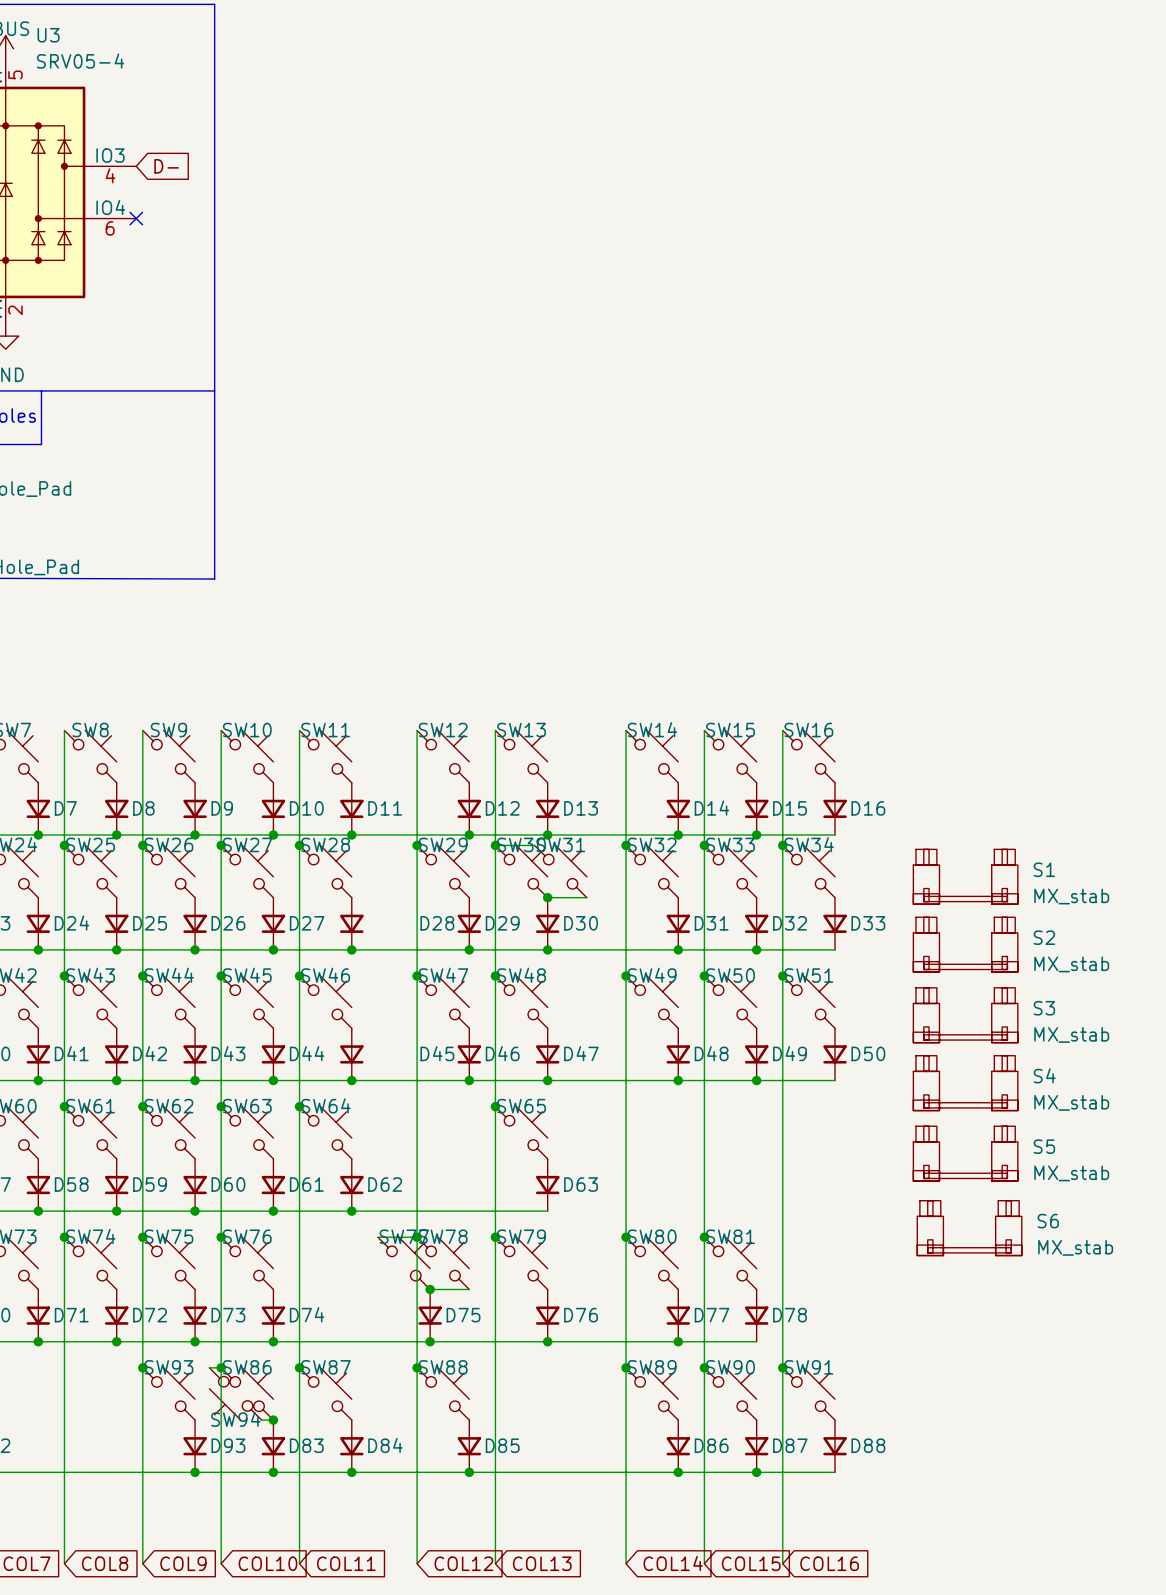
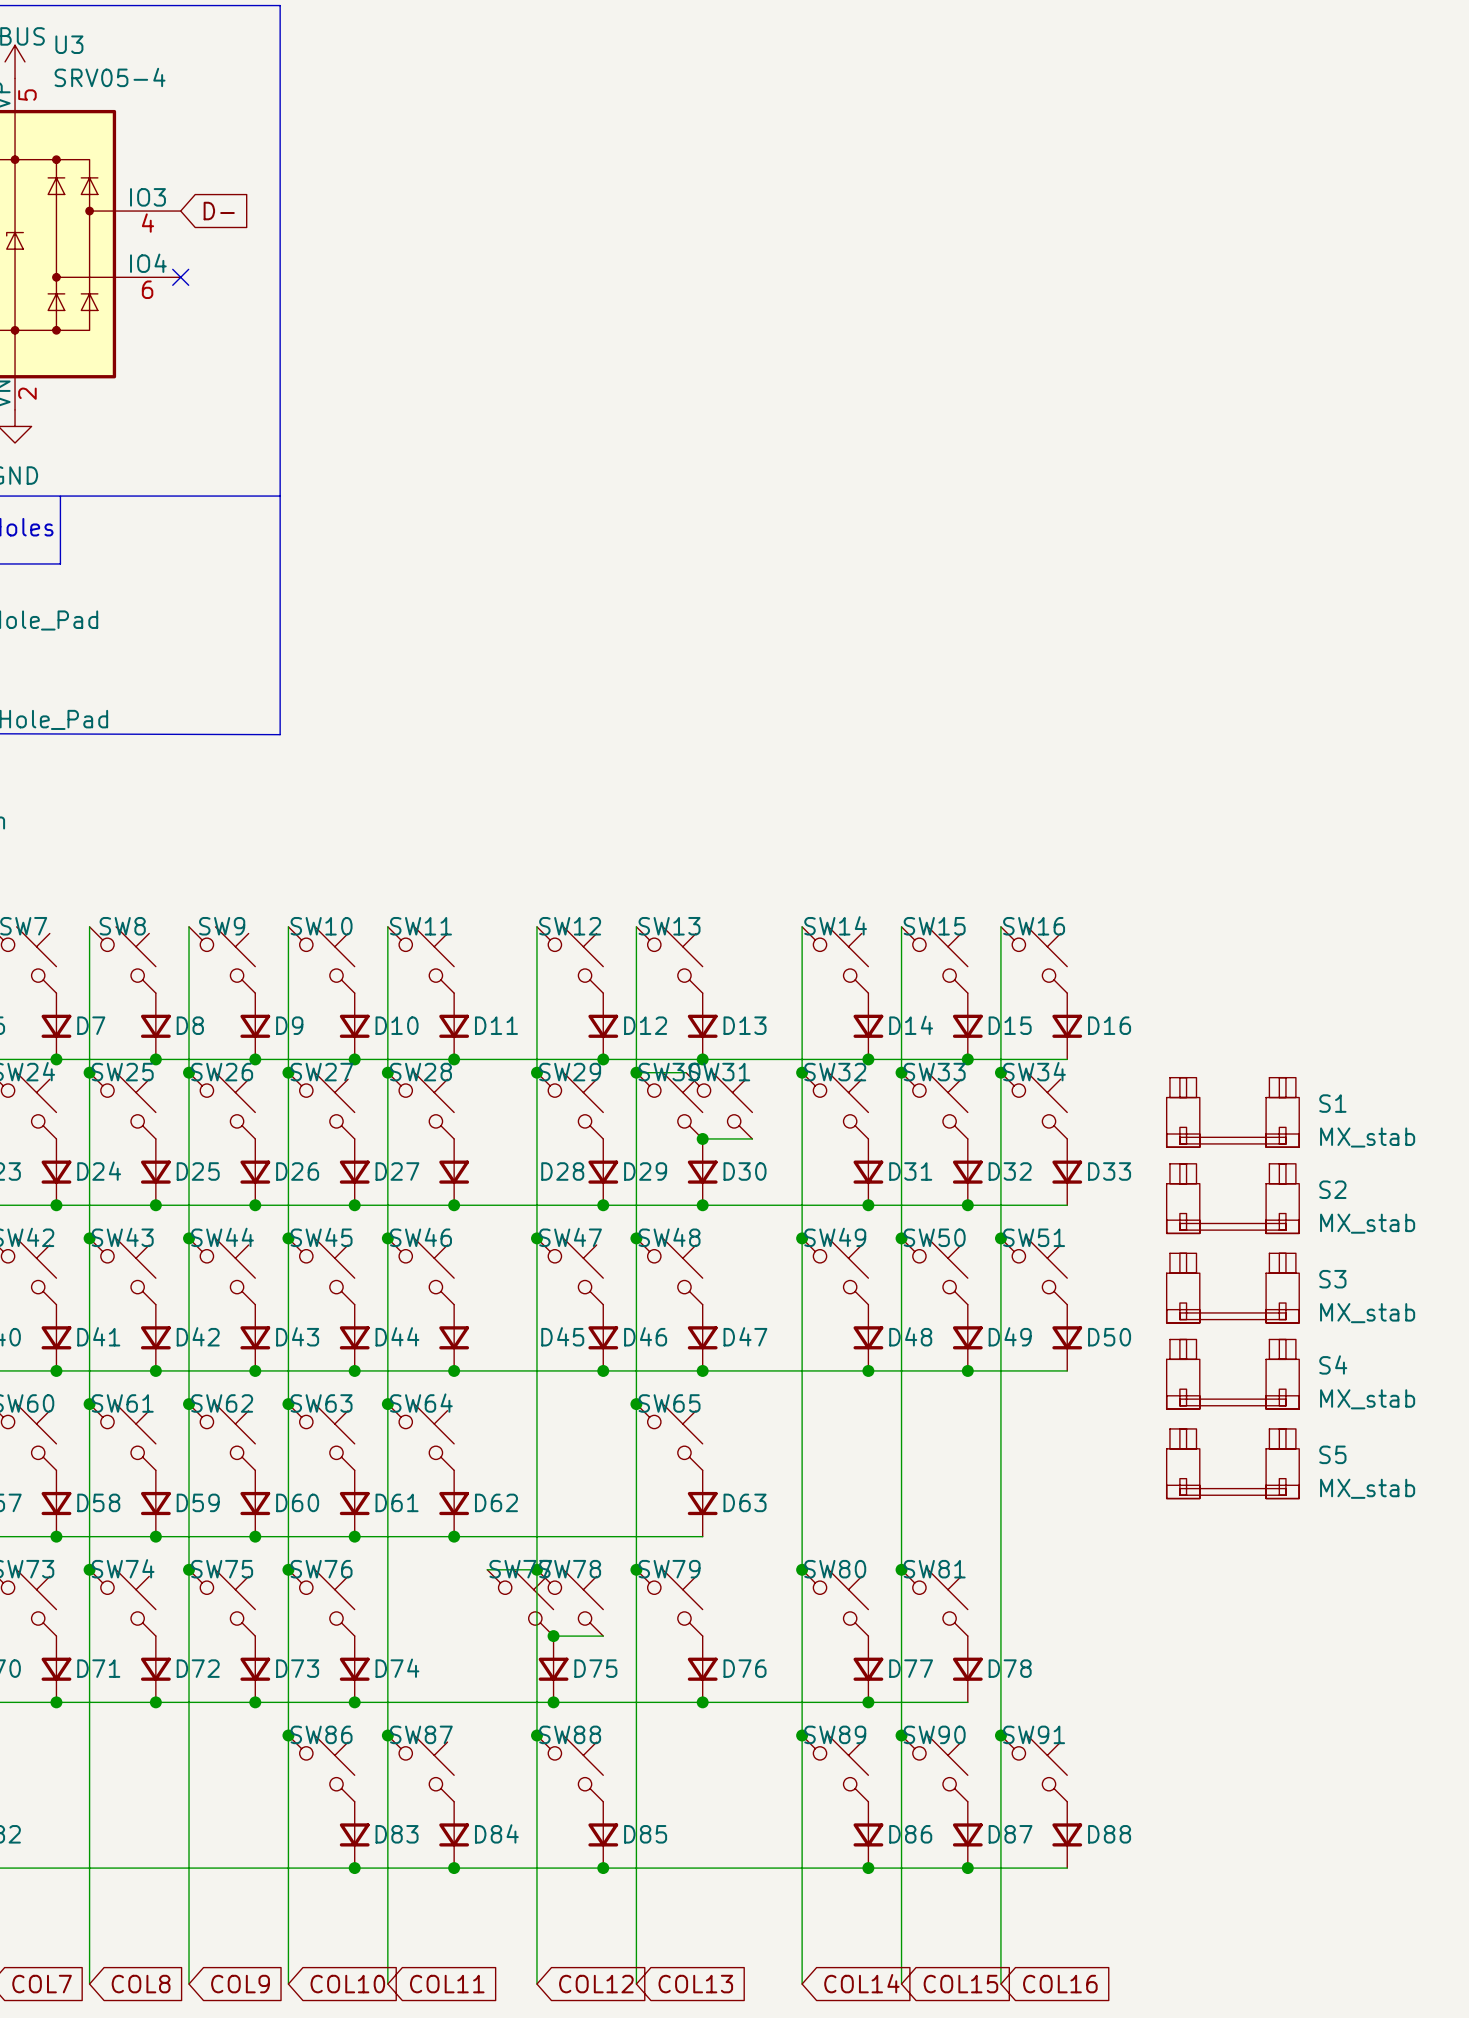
S6: MX_stab (969, 1228) -> none
junction: (142, 1367) -> none
wire: (209, 1367) (221, 1367) -> none
SW93: (168, 1393) -> none
SW94: (235, 1393) -> none
wire: (261, 1420) (273, 1420) -> none
junction: (273, 1420) -> none
D93: (195, 1446) -> none
junction: (195, 1472) -> none

